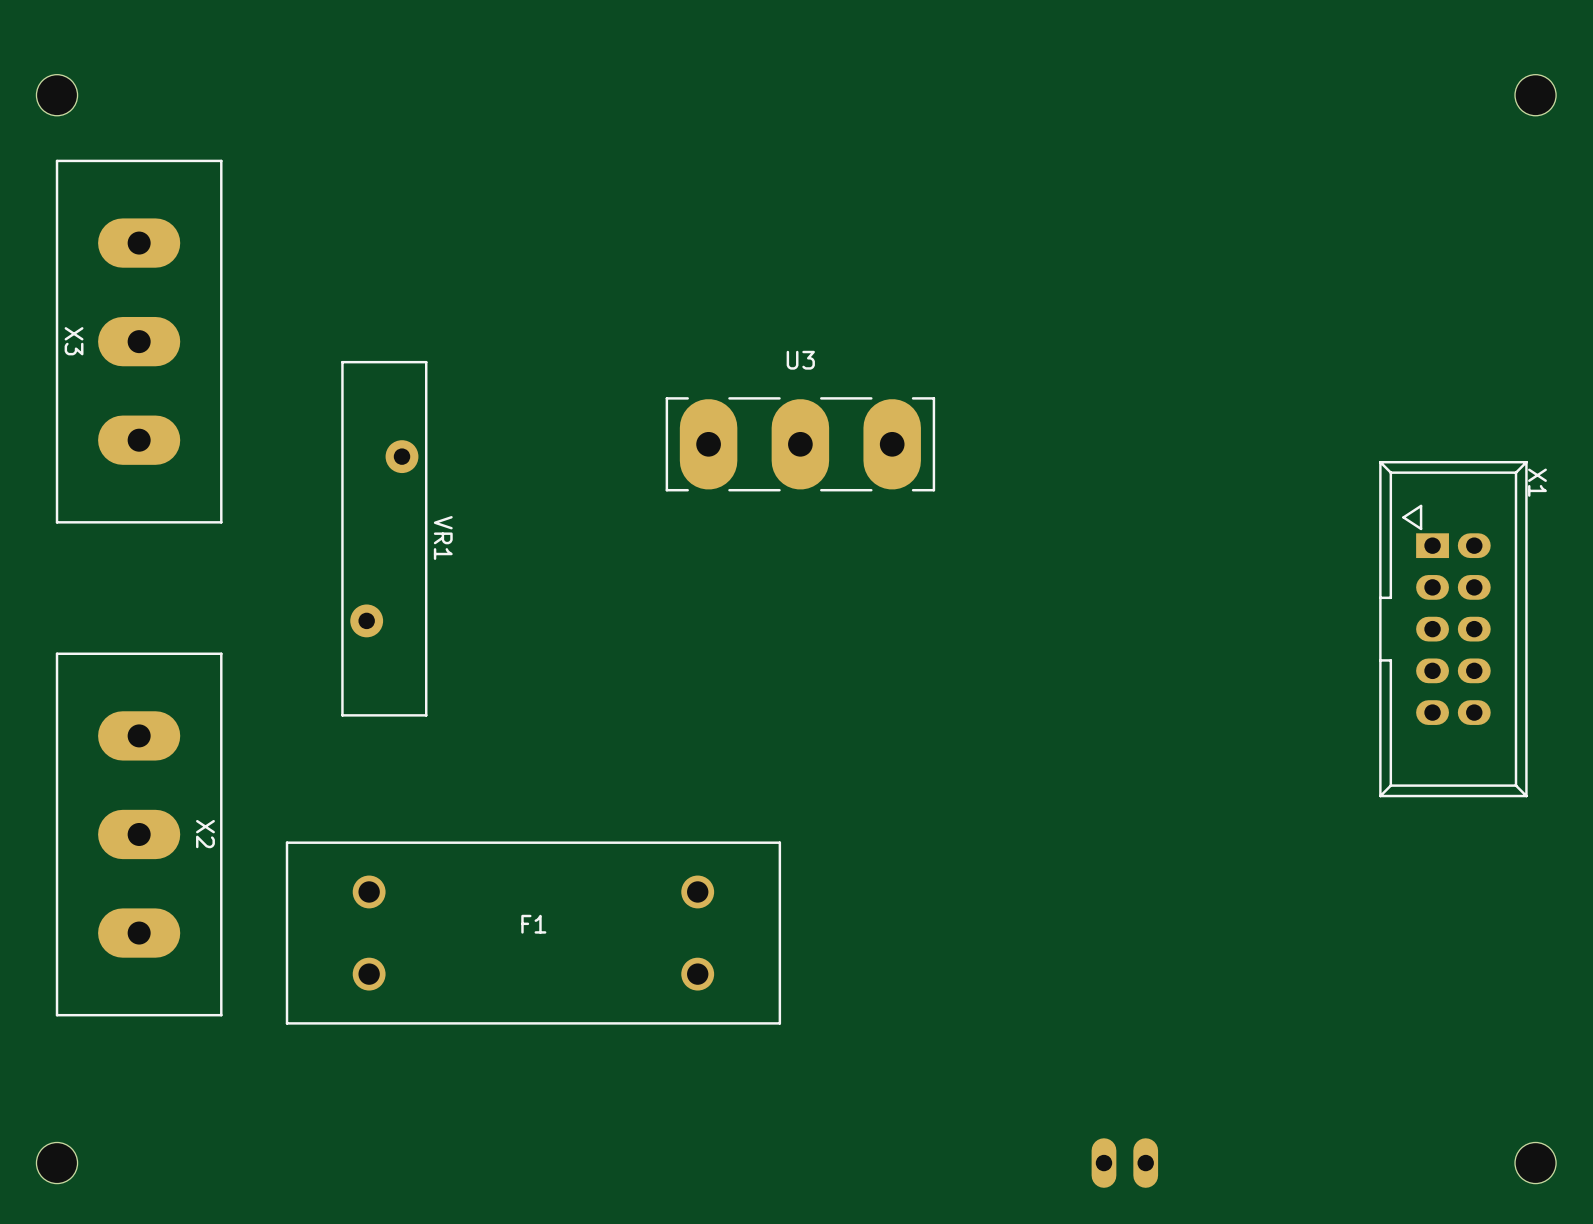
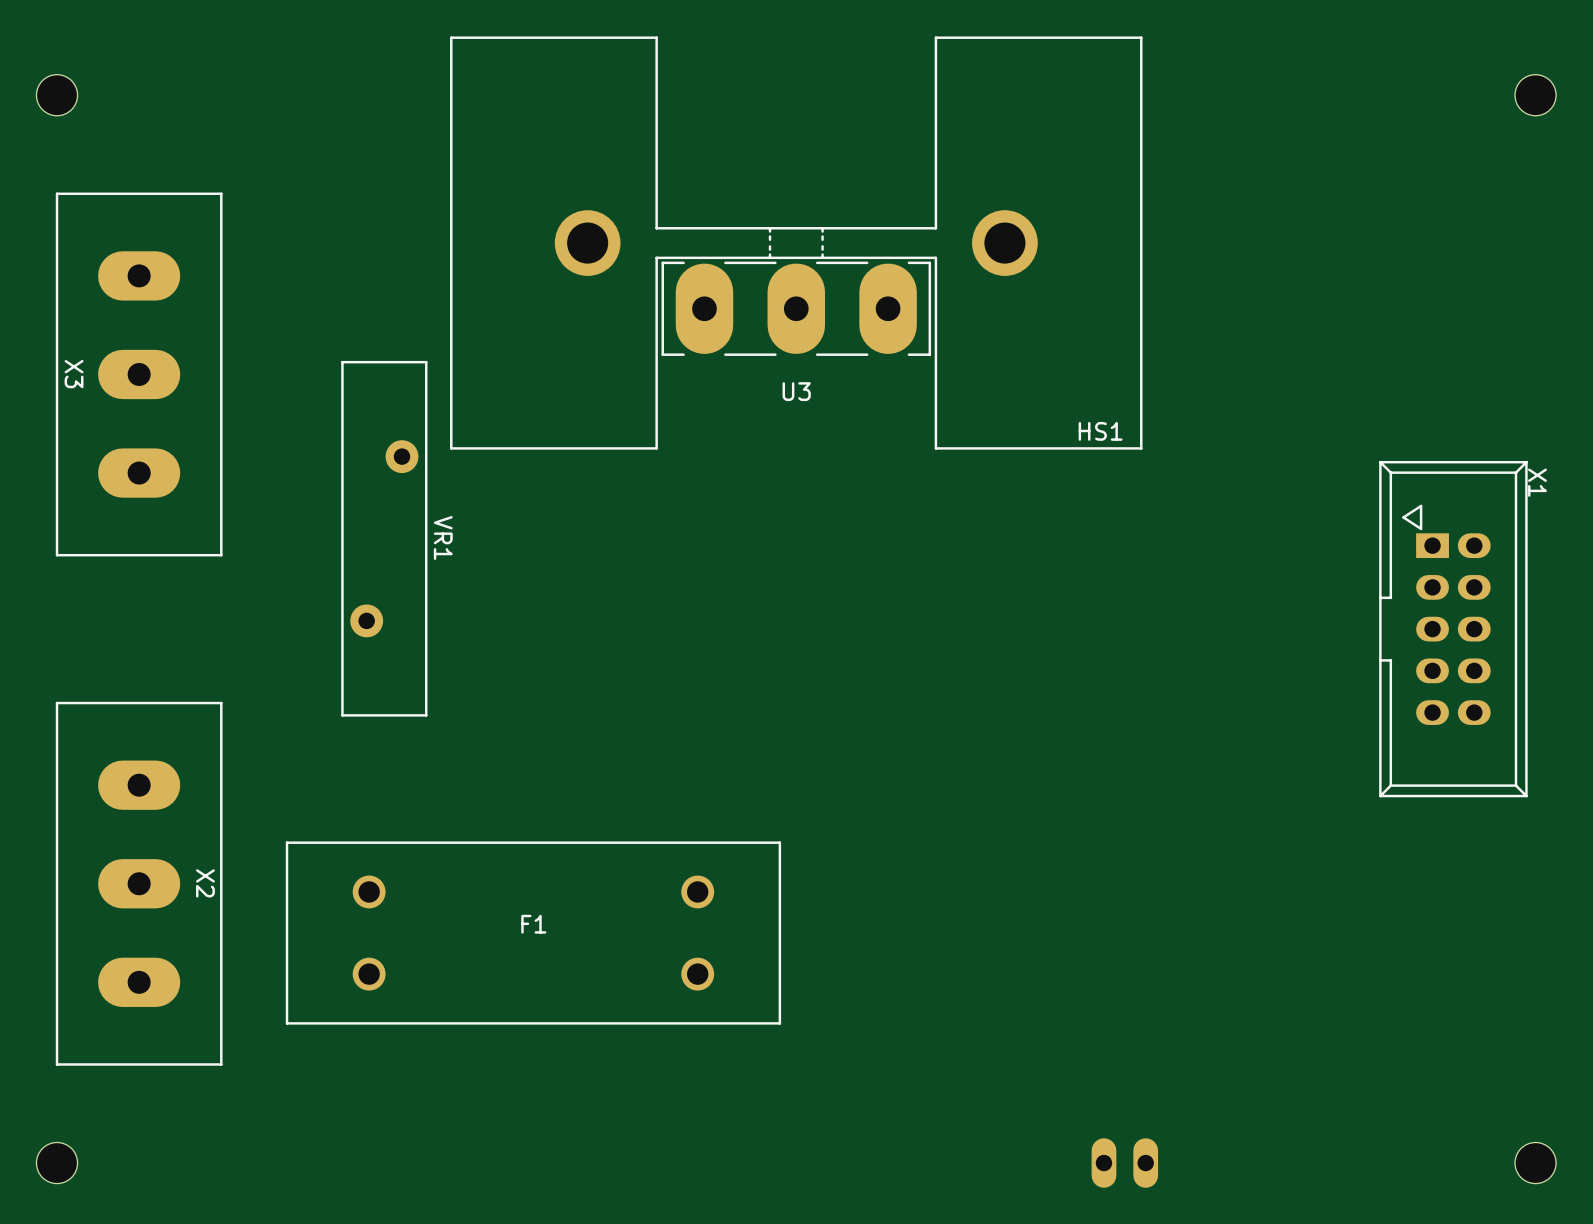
HS1: none -> (796, 243)
X3 position: (139, 341) -> (139, 374)
U3 name position: U3 (800, 360) -> U3 (796, 391)
U3 position: (800, 444) -> (796, 308)
X2 position: (139, 834) -> (139, 883)

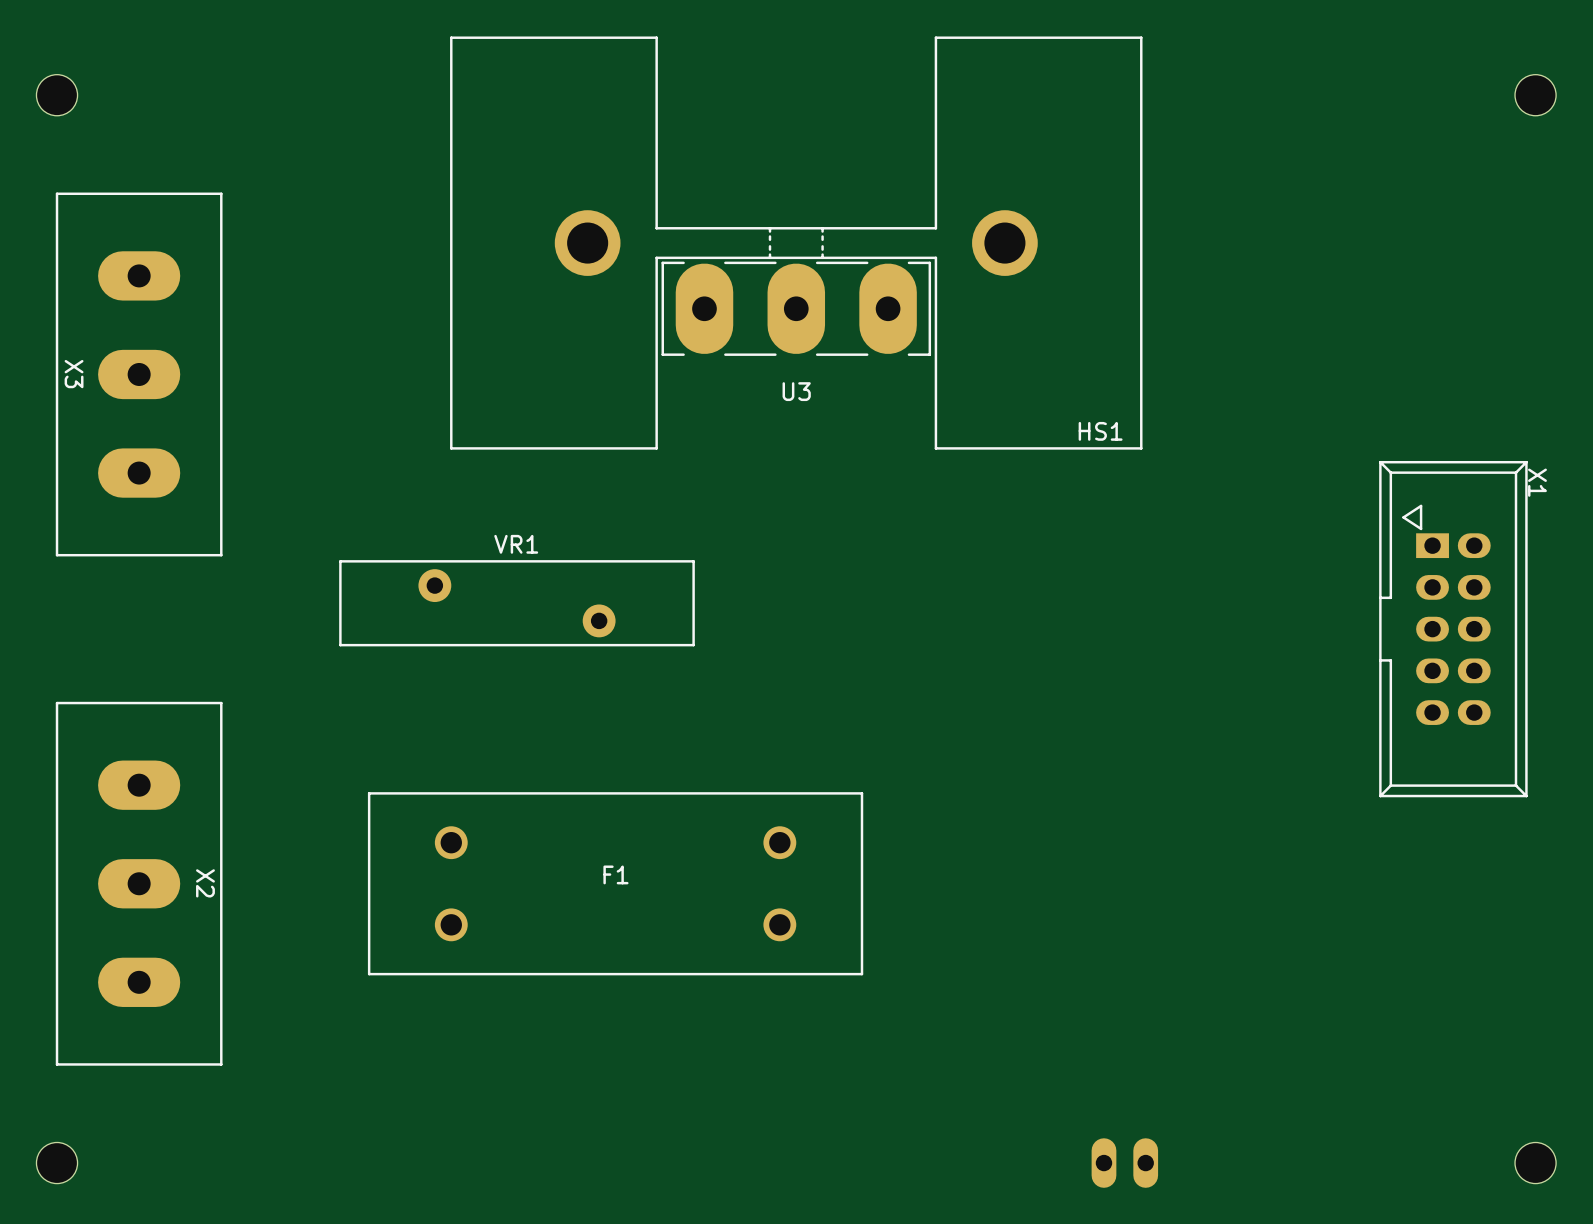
VR1 name position: VR1 (443, 537) -> VR1 (516, 544)
VR1 rotation: 0° (384, 538) -> 90° clockwise (517, 603)
F1 position: (533, 933) -> (615, 883)

